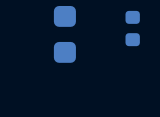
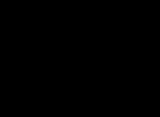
part: (132, 28) -> none
part: (64, 34) -> none

